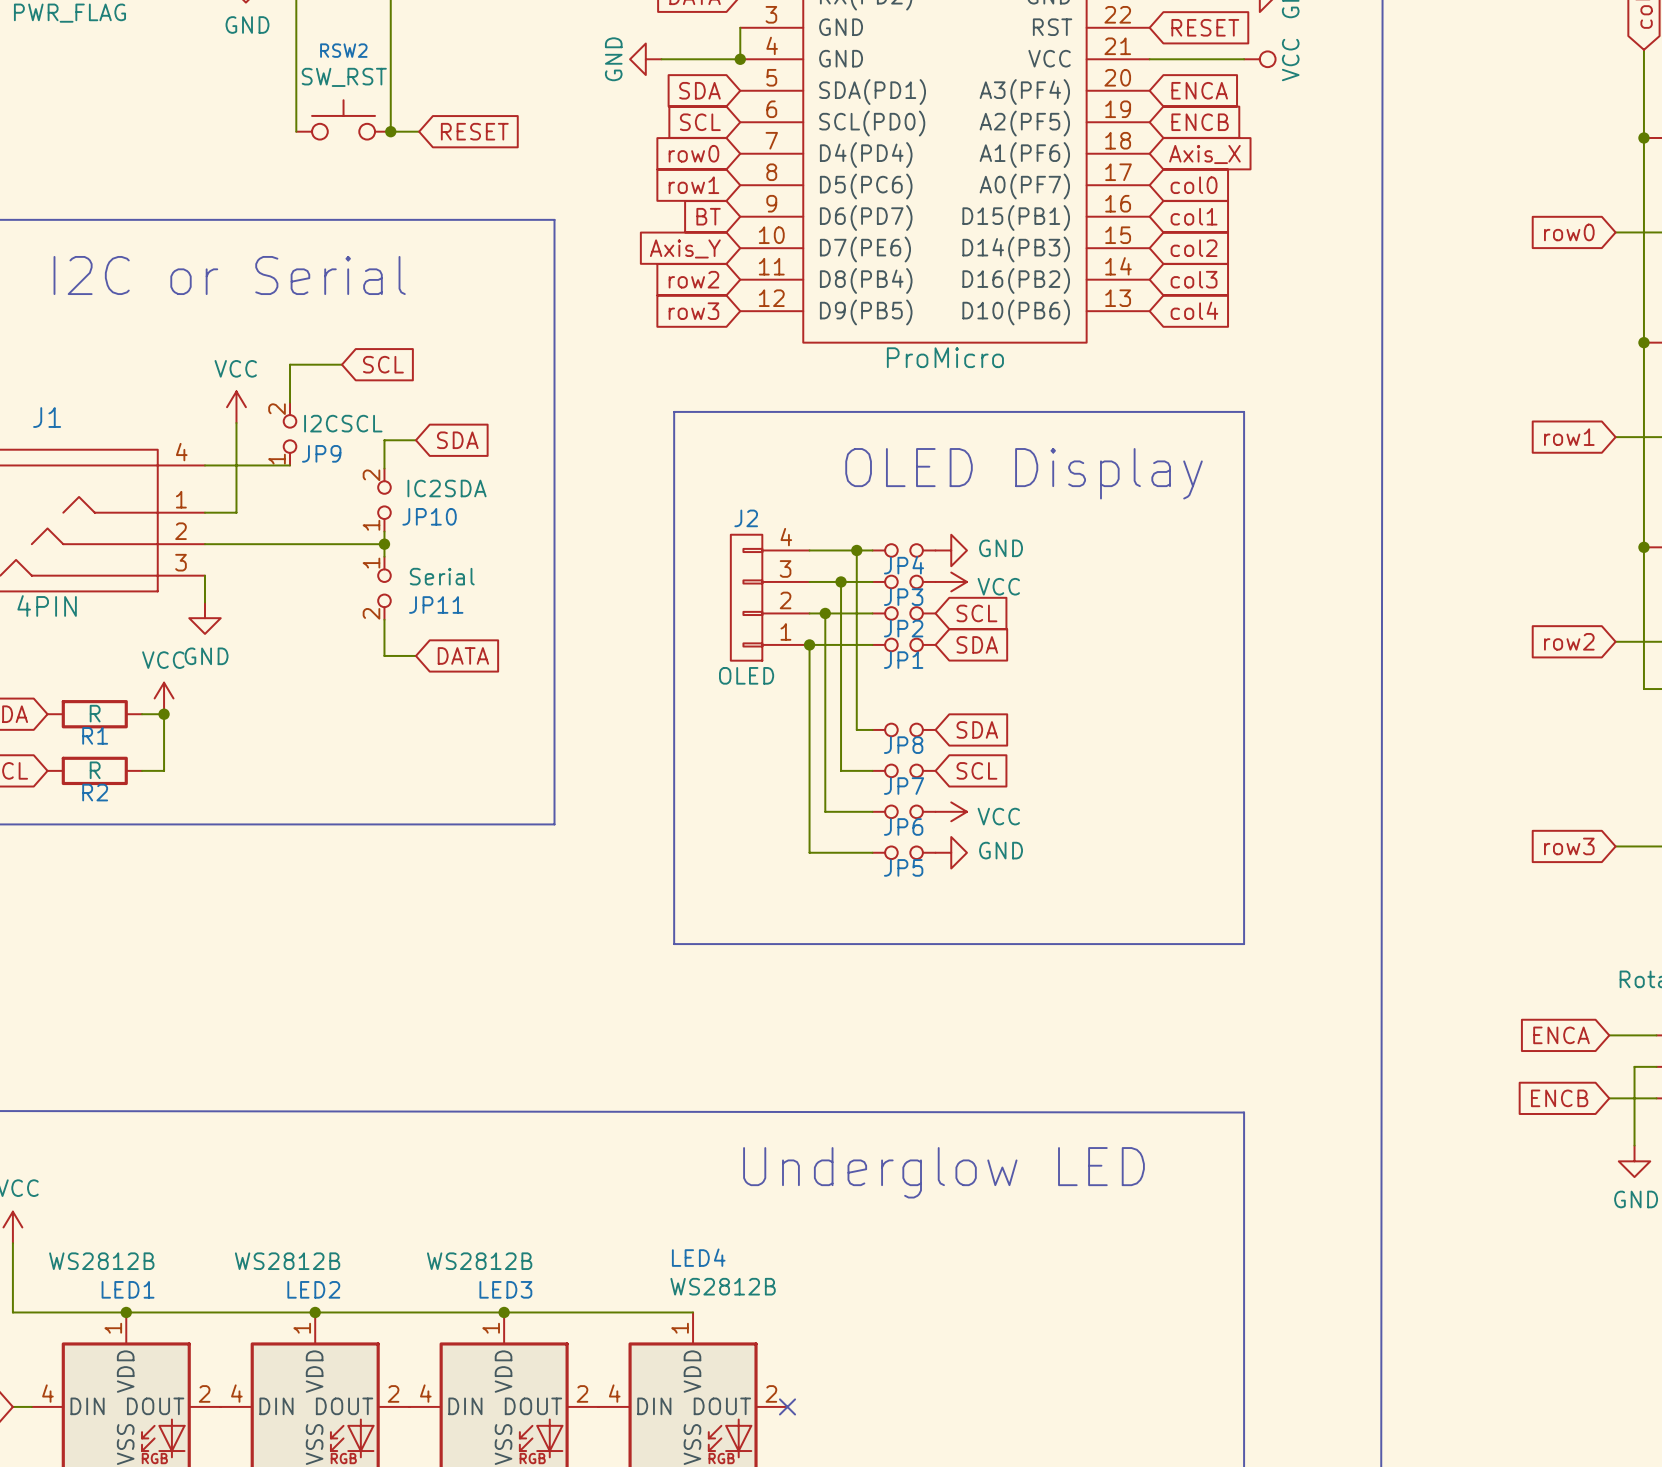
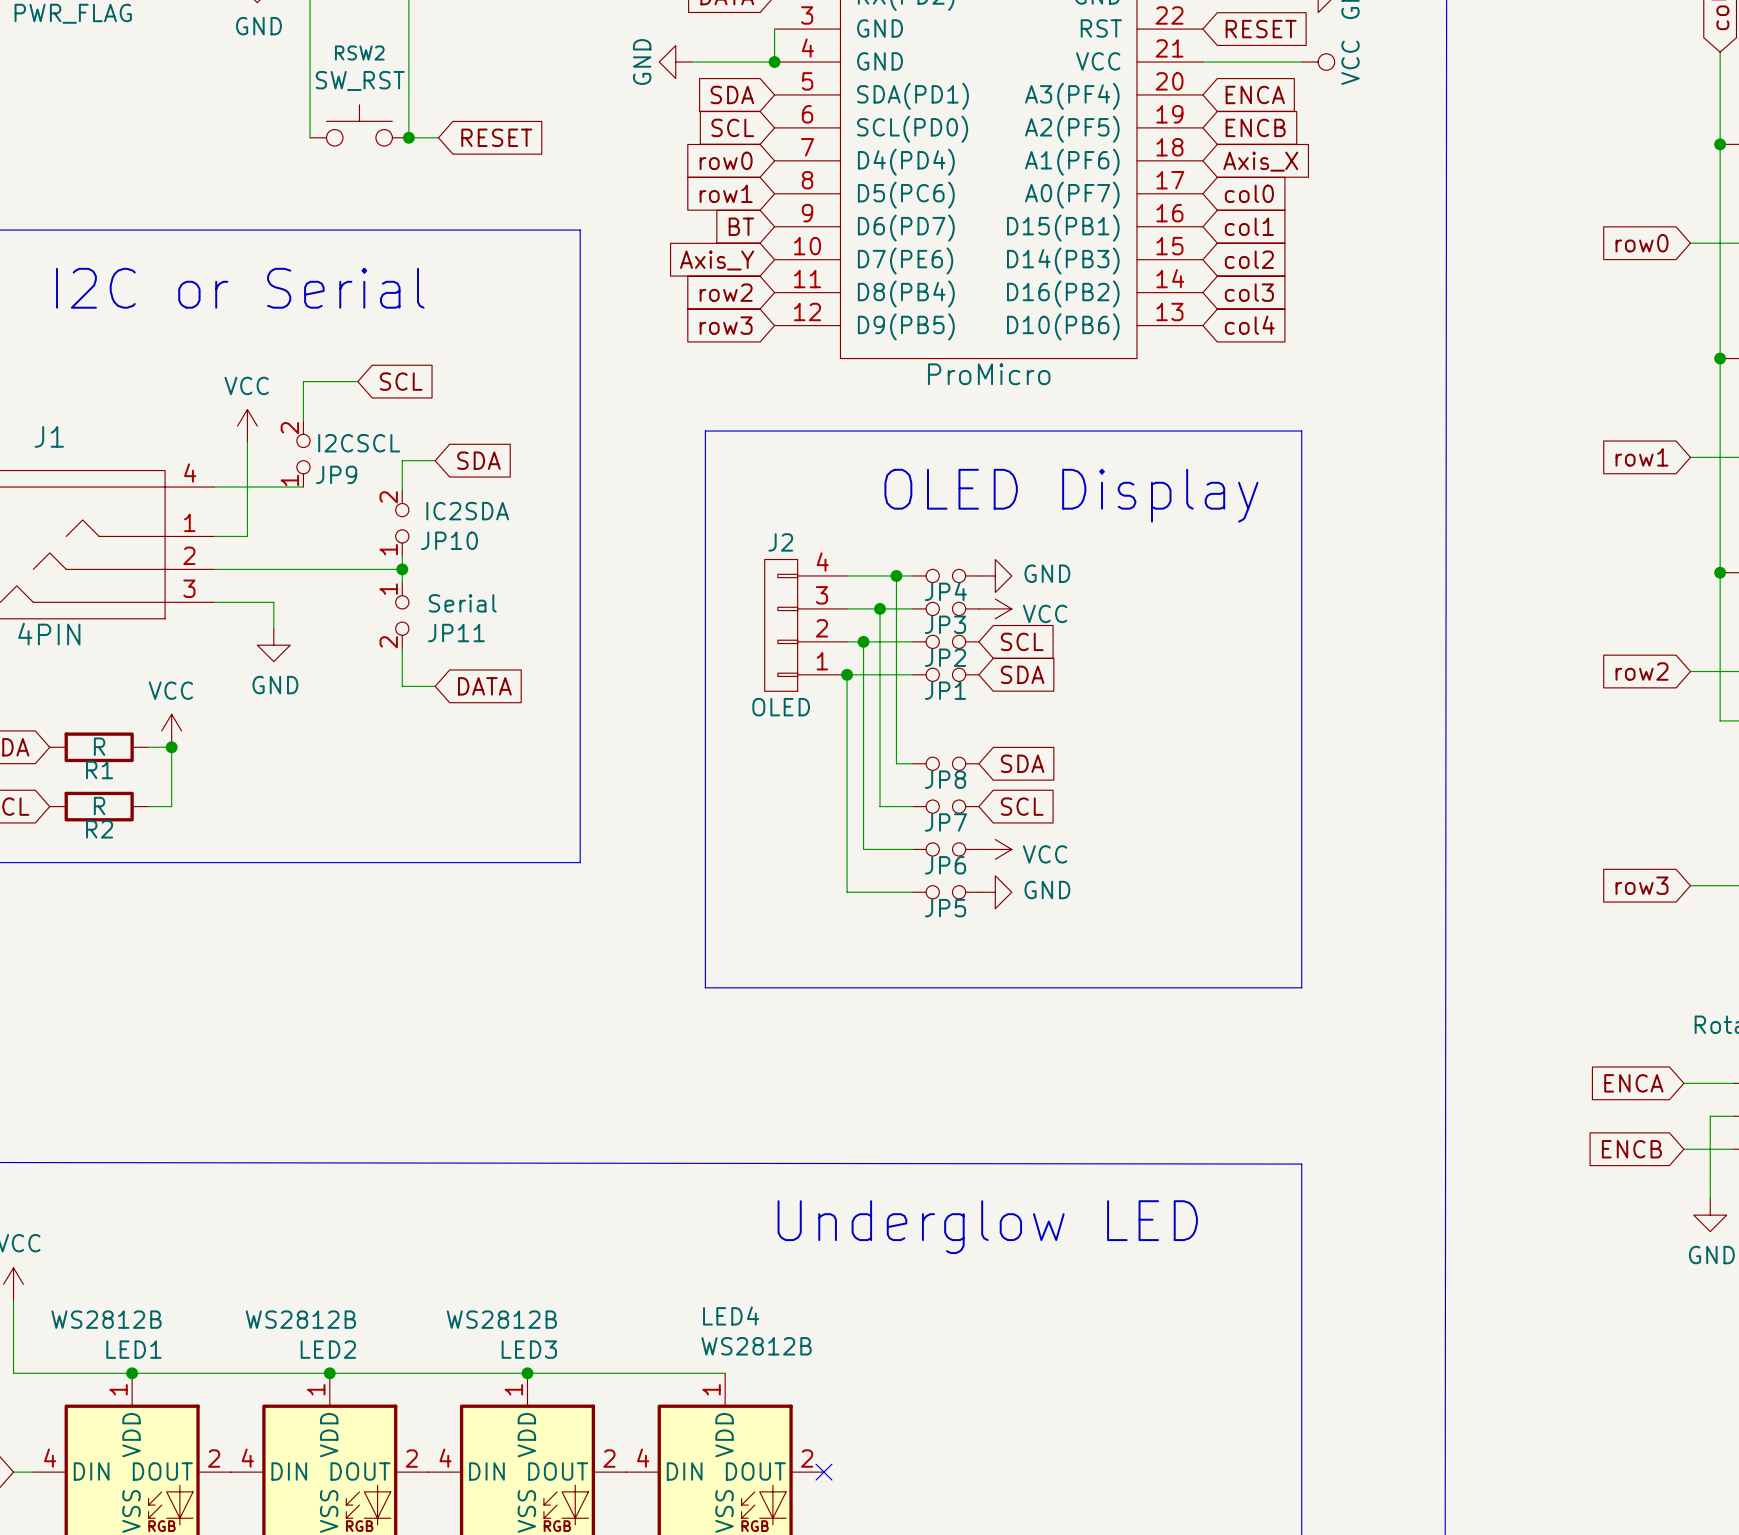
wire: (204, 575) (204, 602) -> (214, 602) (273, 602) (273, 628)
power symbol position: GND (204, 618) -> GND (273, 645)

